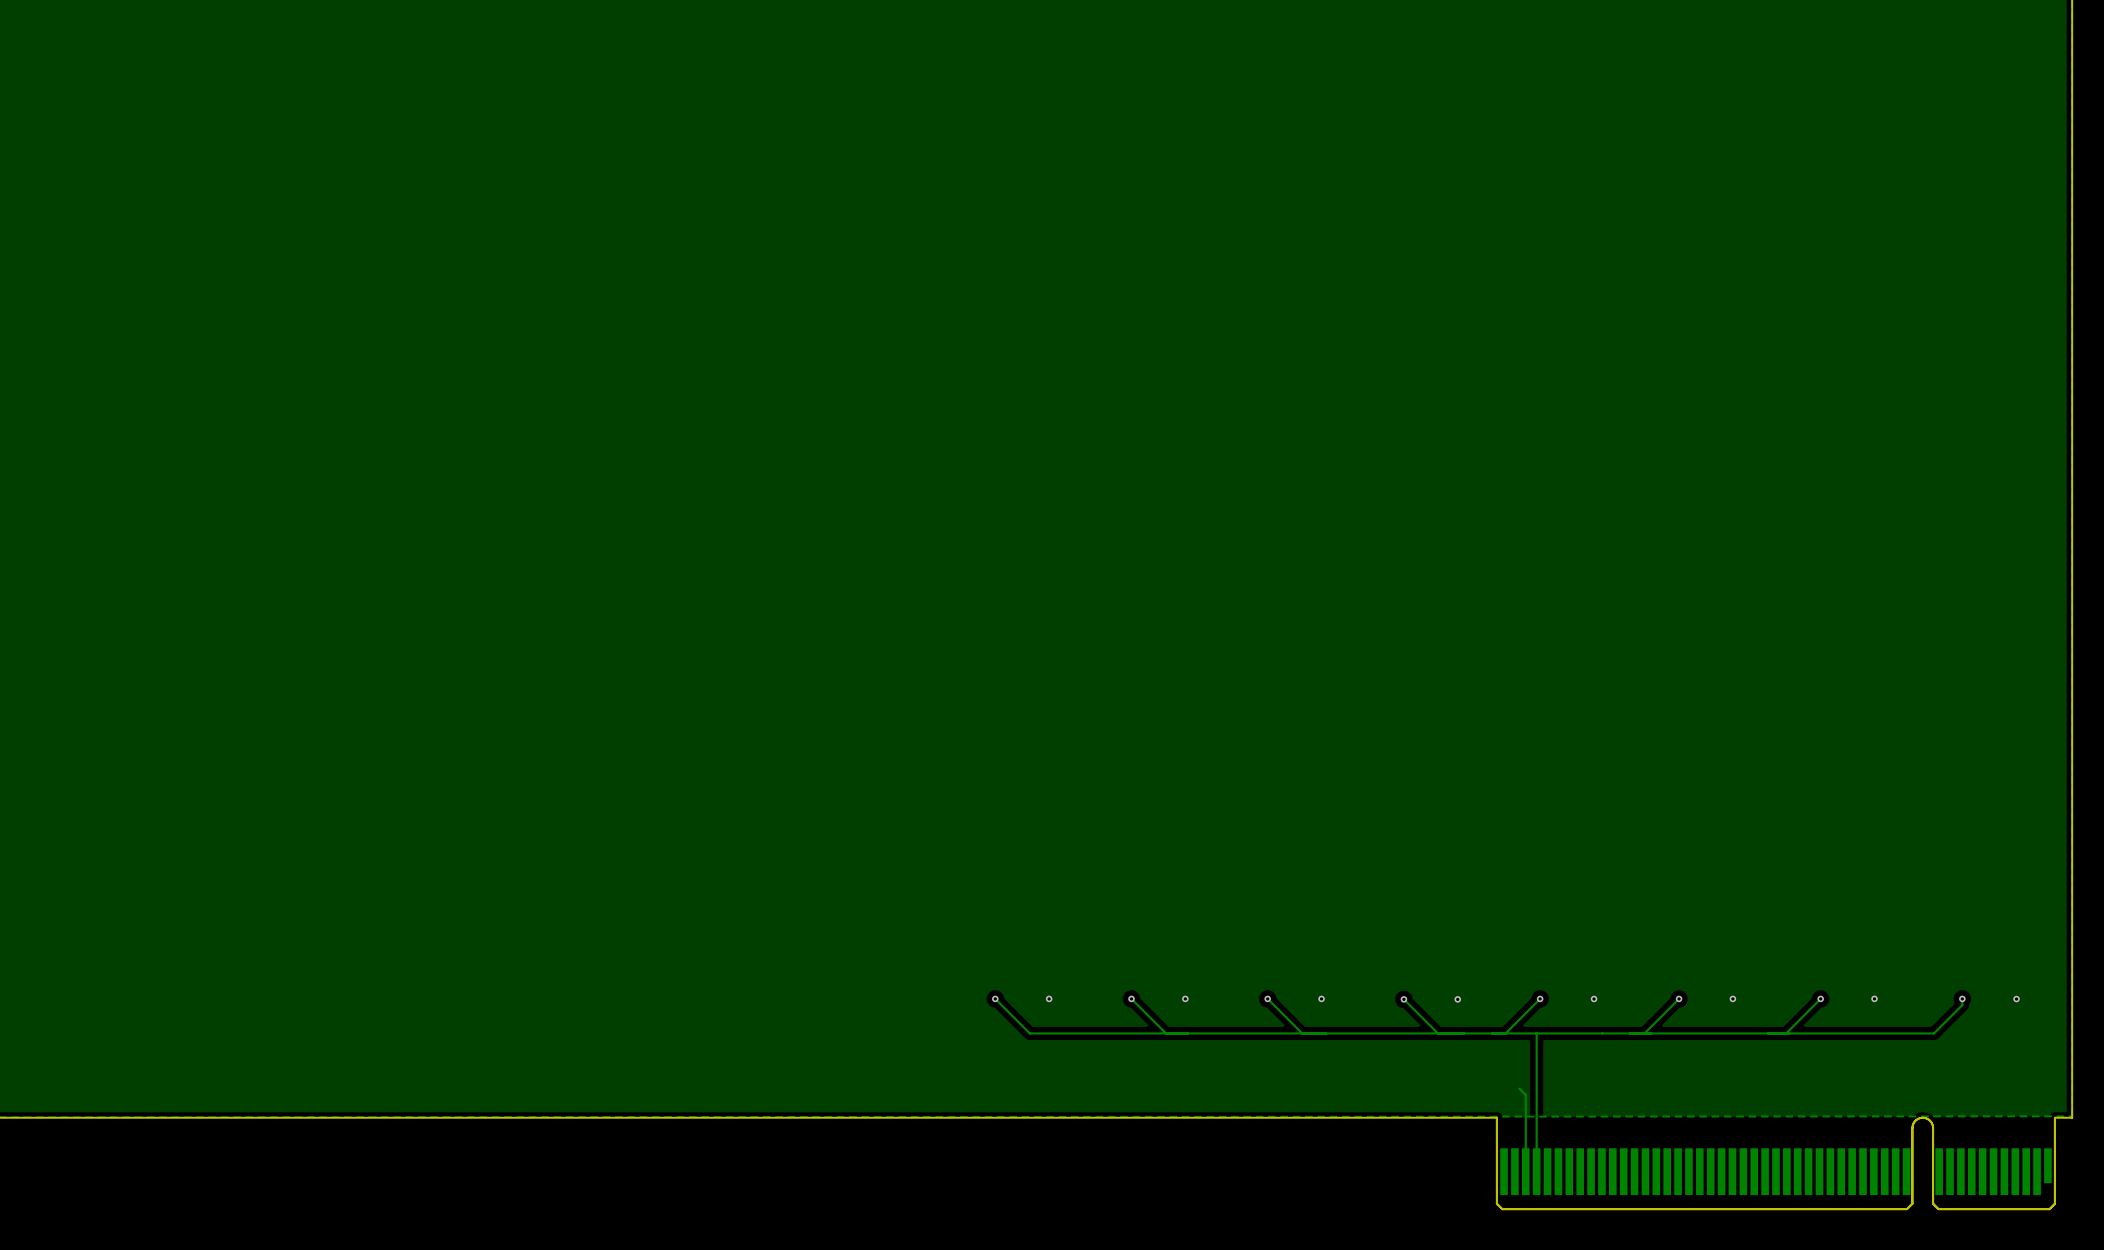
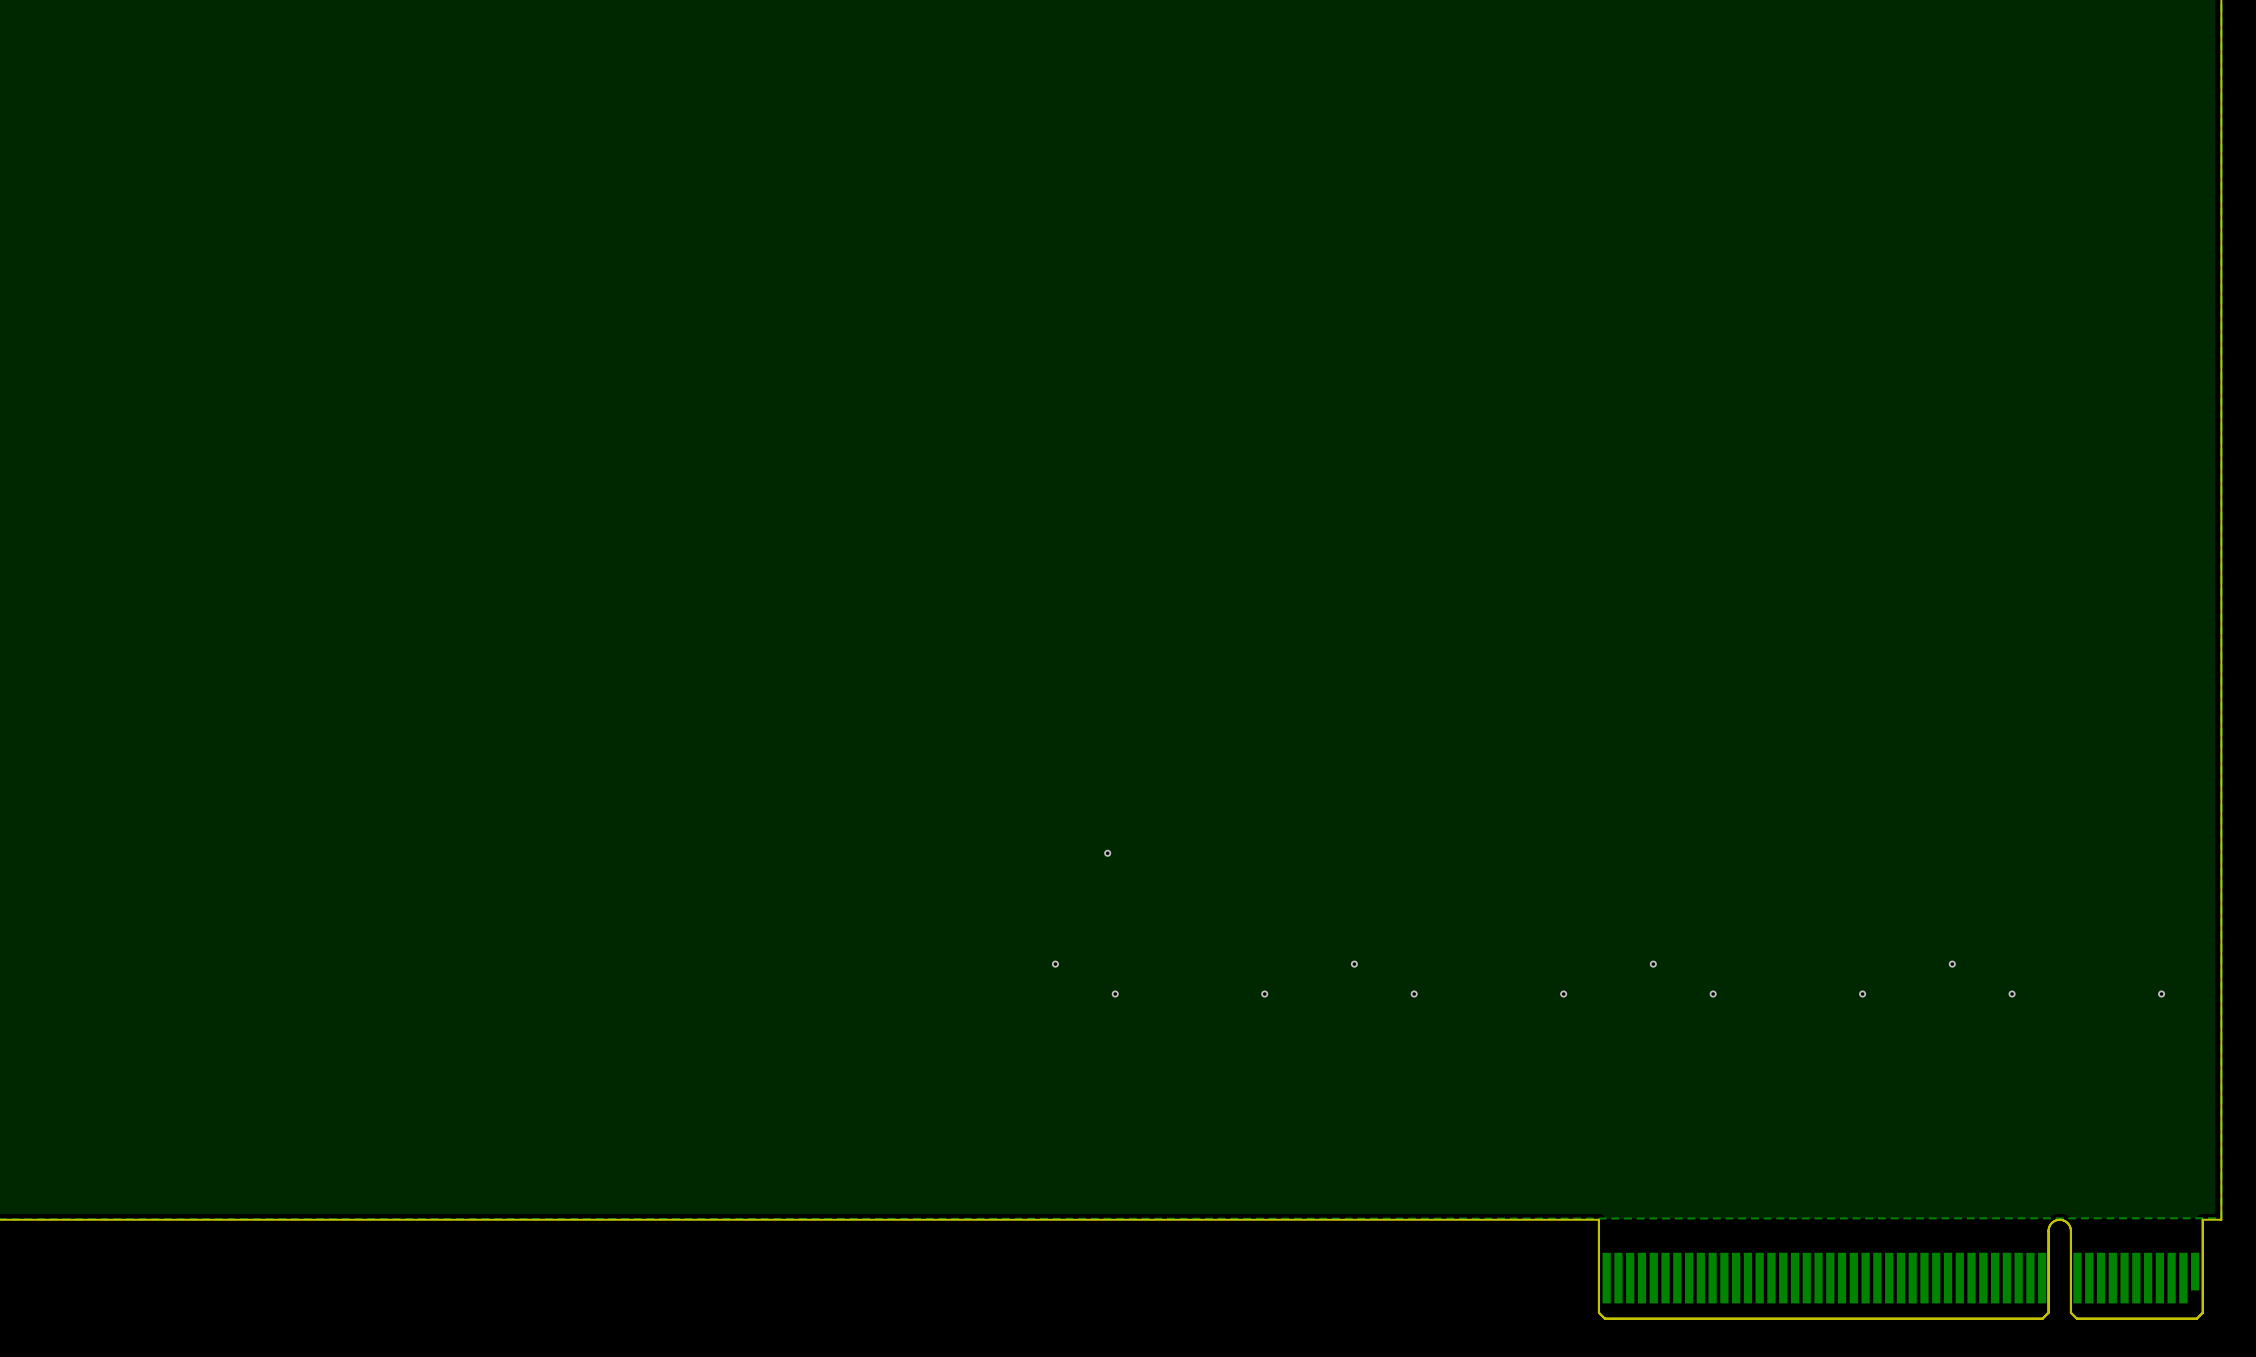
via: none -> (1107, 853)
via: none -> (1055, 964)
via: none -> (1354, 964)
via: none -> (1653, 964)
via: none -> (1952, 964)
via: none -> (1115, 994)
via: none -> (1264, 994)
via: none -> (1414, 994)
via: none -> (1563, 994)
via: none -> (1713, 994)
via: none -> (1862, 994)
via: none -> (2012, 994)
via: none -> (2161, 994)
via: (995, 998) -> none
via: (1049, 998) -> none
track: (1131, 998) (1166, 1033) -> none
via: (1131, 998) -> none
via: (1185, 998) -> none
track: (1267, 998) (1302, 1033) -> none
via: (1267, 998) -> none
via: (1321, 998) -> none
track: (1540, 998) (1505, 1033) -> none
via: (1540, 998) -> none
via: (1594, 998) -> none
track: (1679, 998) (1644, 1033) -> none
via: (1679, 998) -> none
via: (1732, 998) -> none
track: (1820, 998) (1786, 1033) -> none
via: (1820, 998) -> none
via: (1874, 998) -> none
track: (1962, 998) (1962, 1005) (1934, 1033) (1029, 1033) (995, 998) -> none
via: (1962, 998) -> none
track: (1403, 999) (1437, 1033) -> none
via: (1403, 999) -> none
via: (1457, 999) -> none
via: (2016, 999) -> none
track: (1536, 1033) (1536, 1171) -> none
track: (1519, 1088) (1525, 1094) (1525, 1171) -> none

